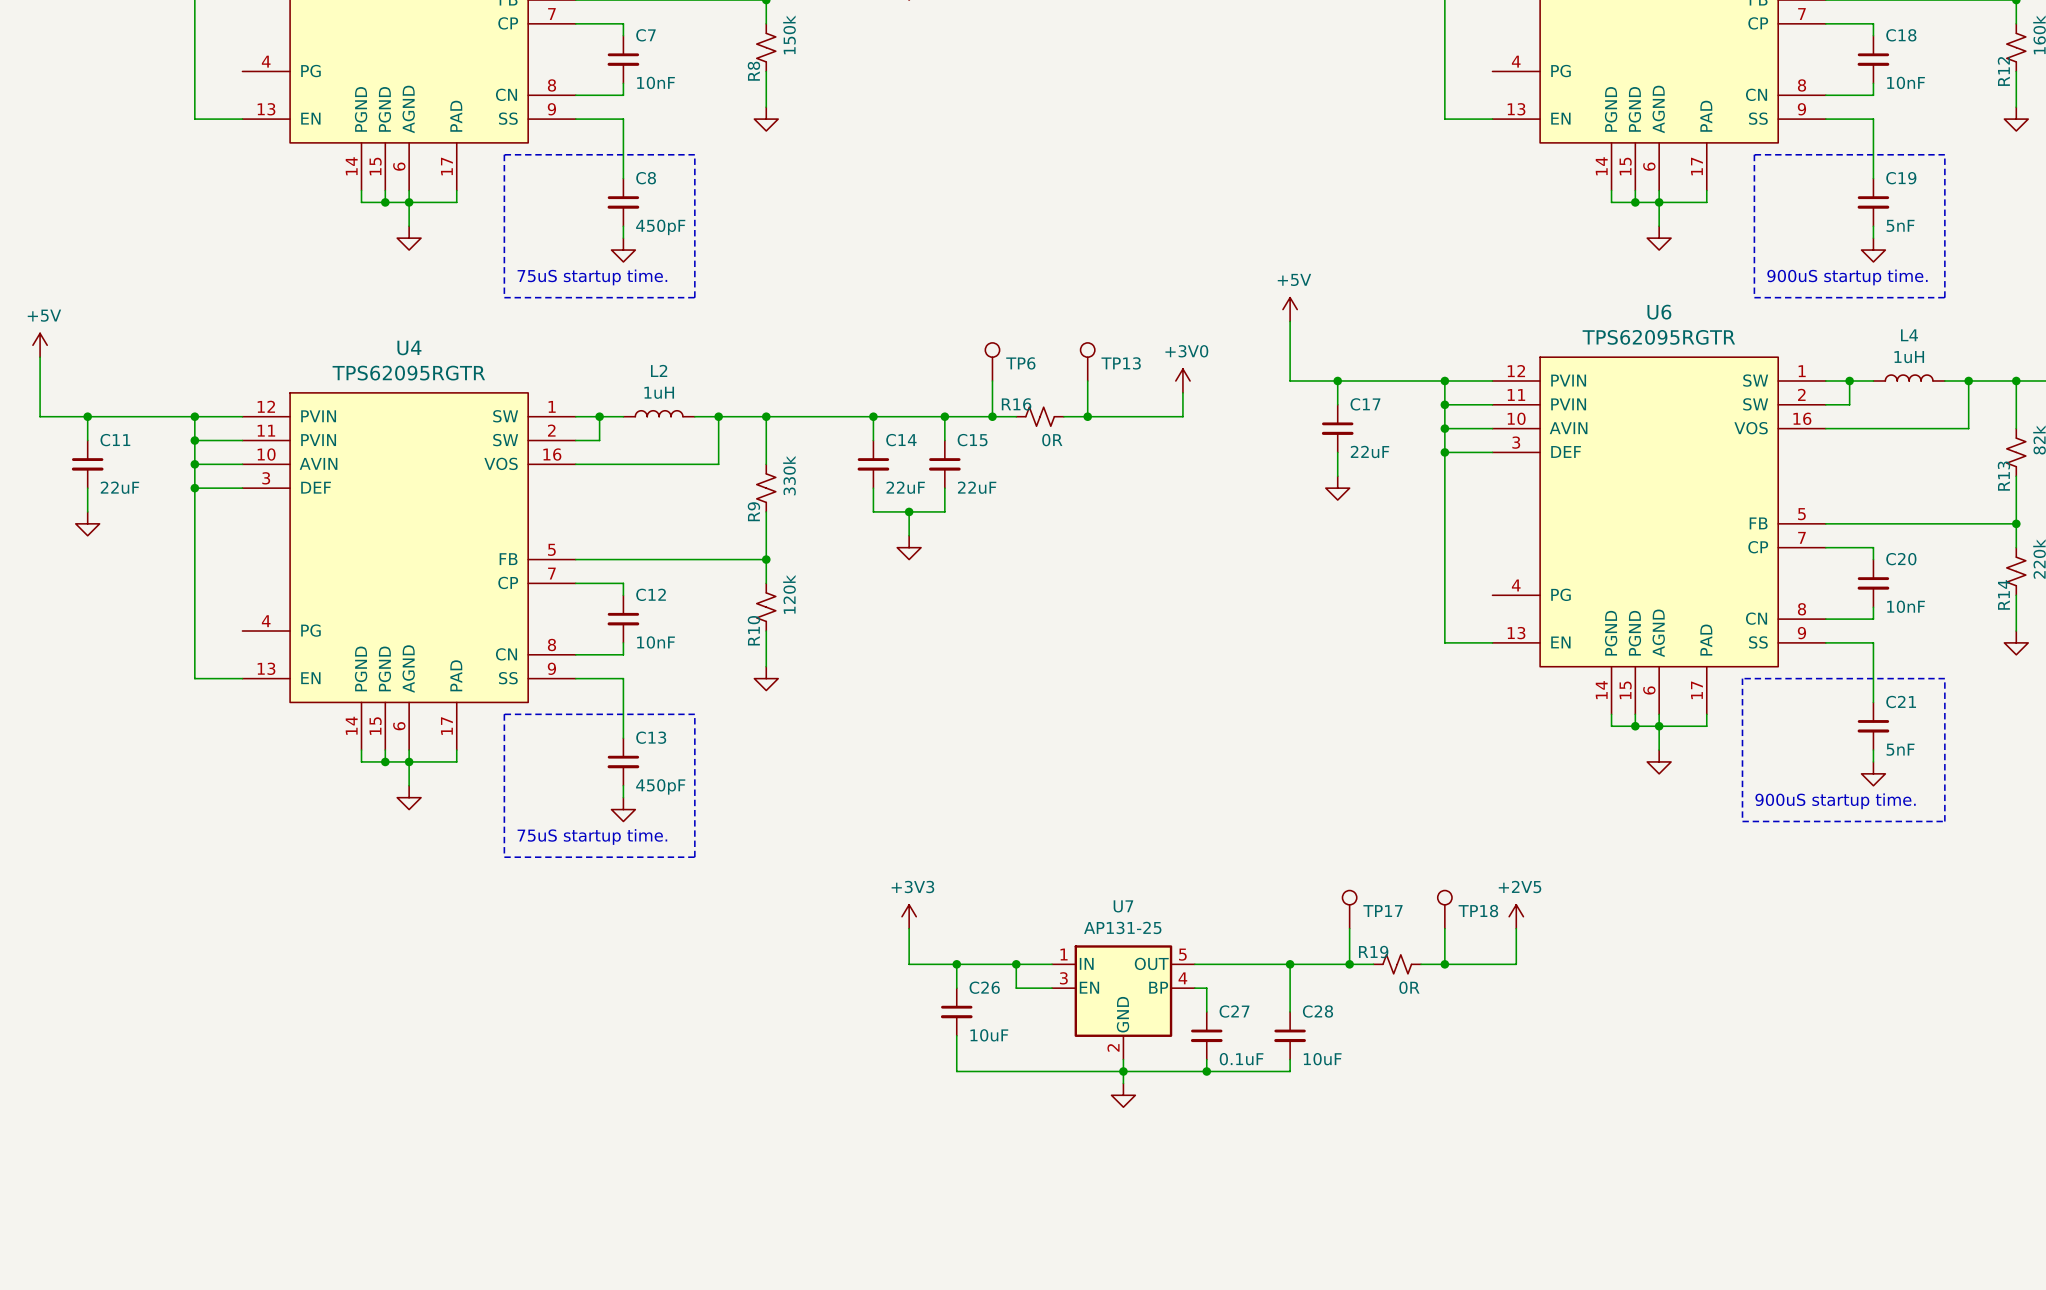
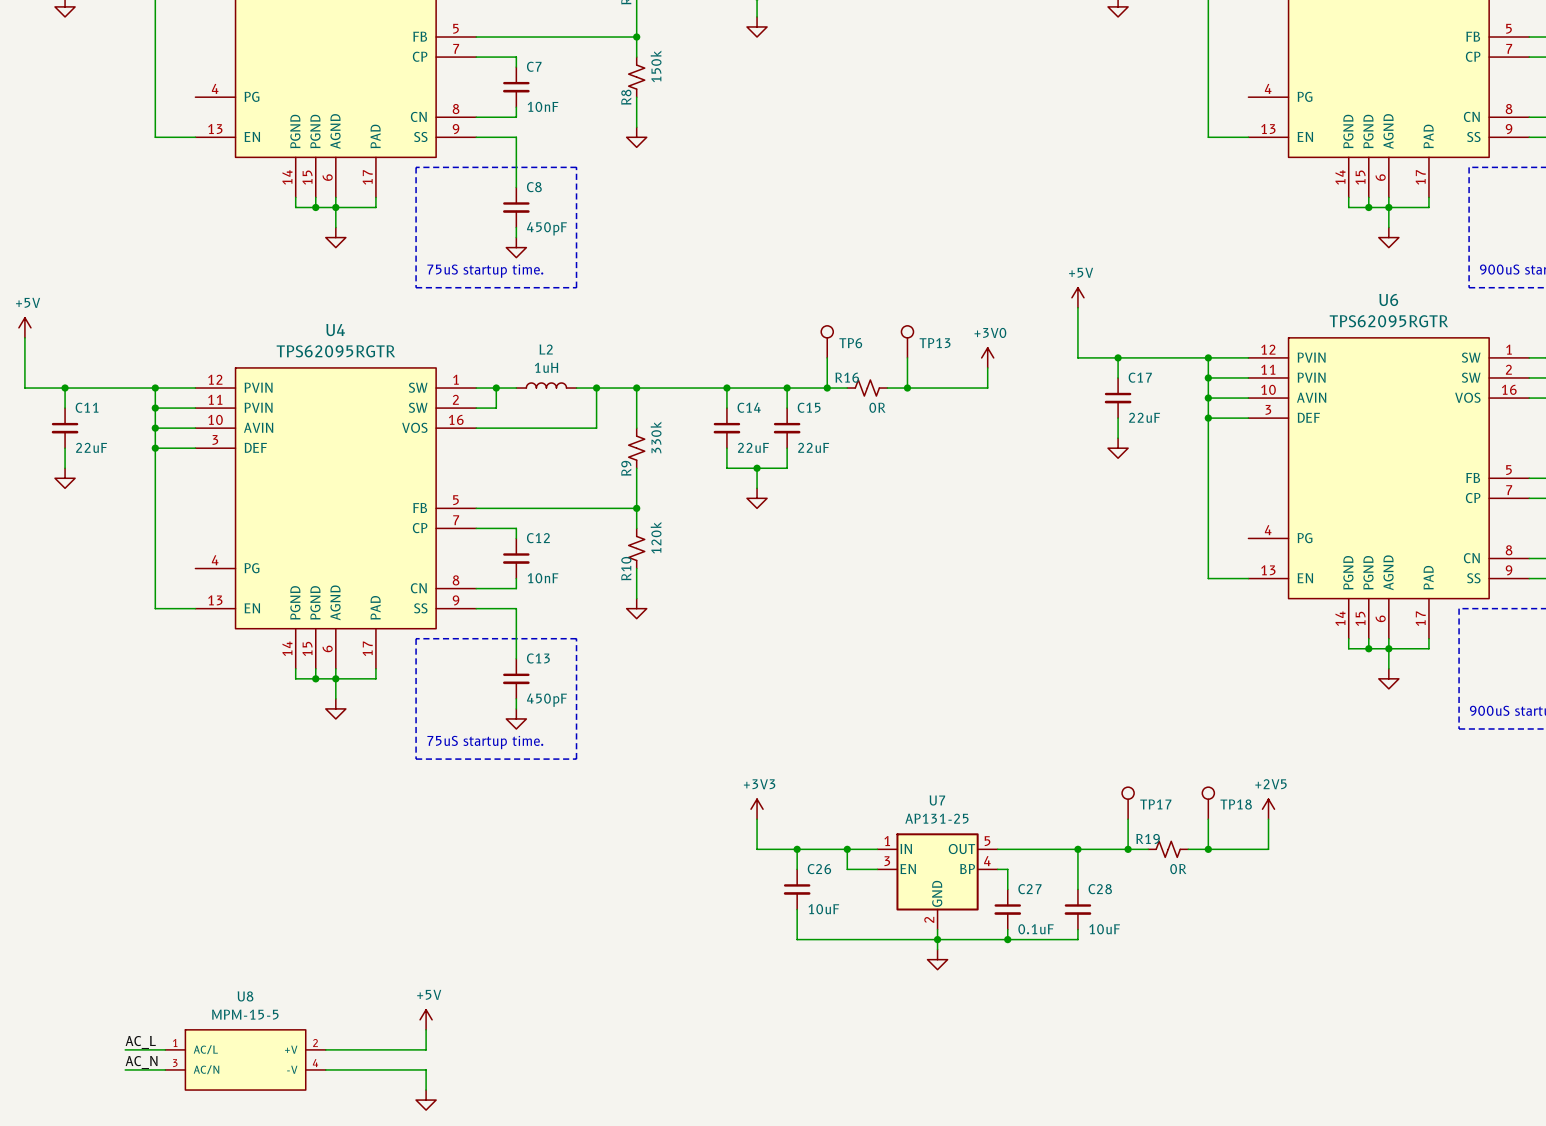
power symbol: none -> +5V (426, 1019)
wire: none -> (426, 1029) (426, 1049) (325, 1049)
label: none -> AC_L (140, 1042)
wire: none -> (125, 1049) (165, 1049)
U8: none -> MPM-15-5 (245, 1059)
label: none -> AC_N (141, 1062)
wire: none -> (125, 1069) (165, 1069)
wire: none -> (325, 1069) (426, 1069) (426, 1090)
power symbol: none -> (426, 1100)

